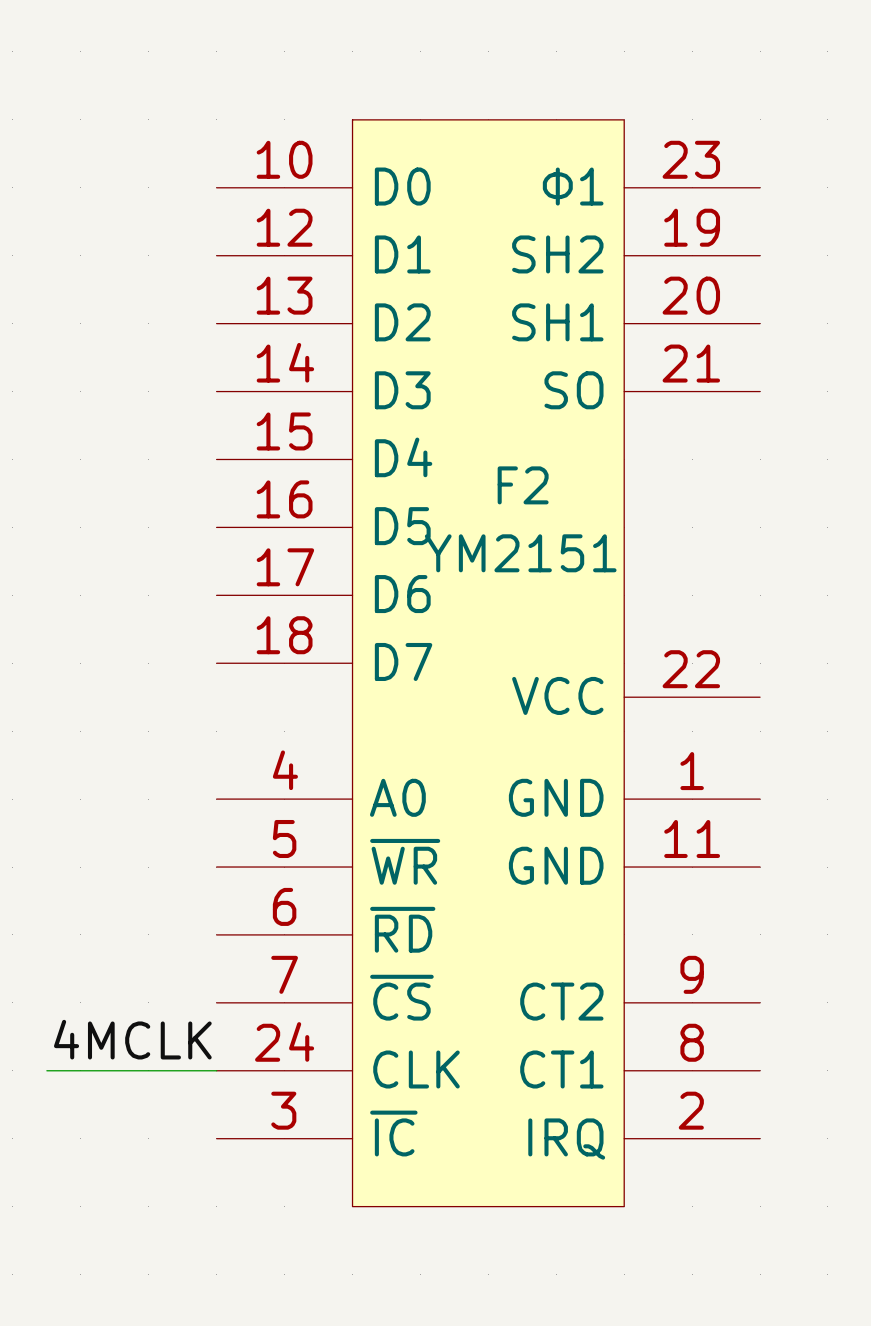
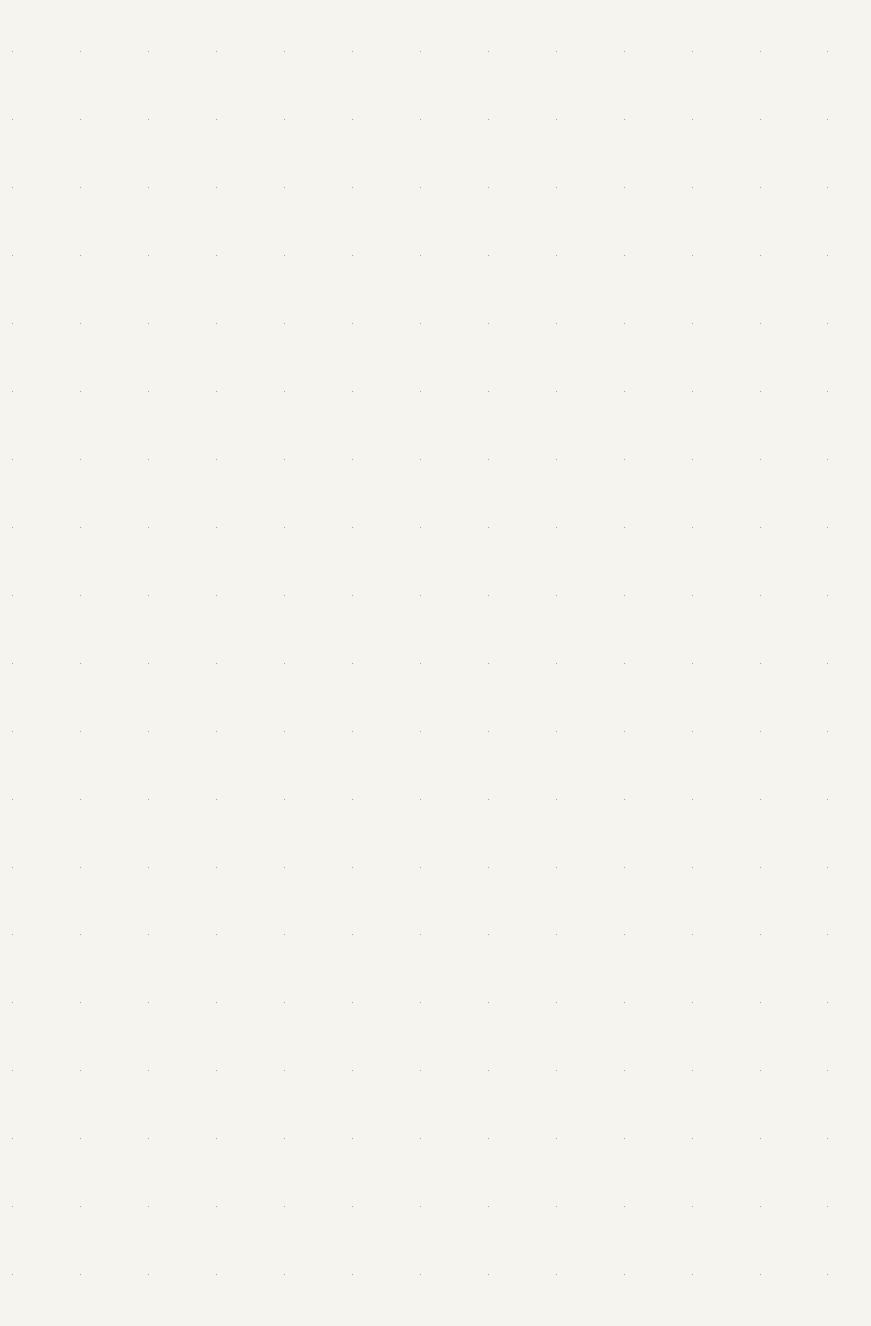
F2: YM2151 (488, 663) -> none
label: 4MCLK (132, 1039) -> none
wire: (46, 1070) (216, 1070) -> none

